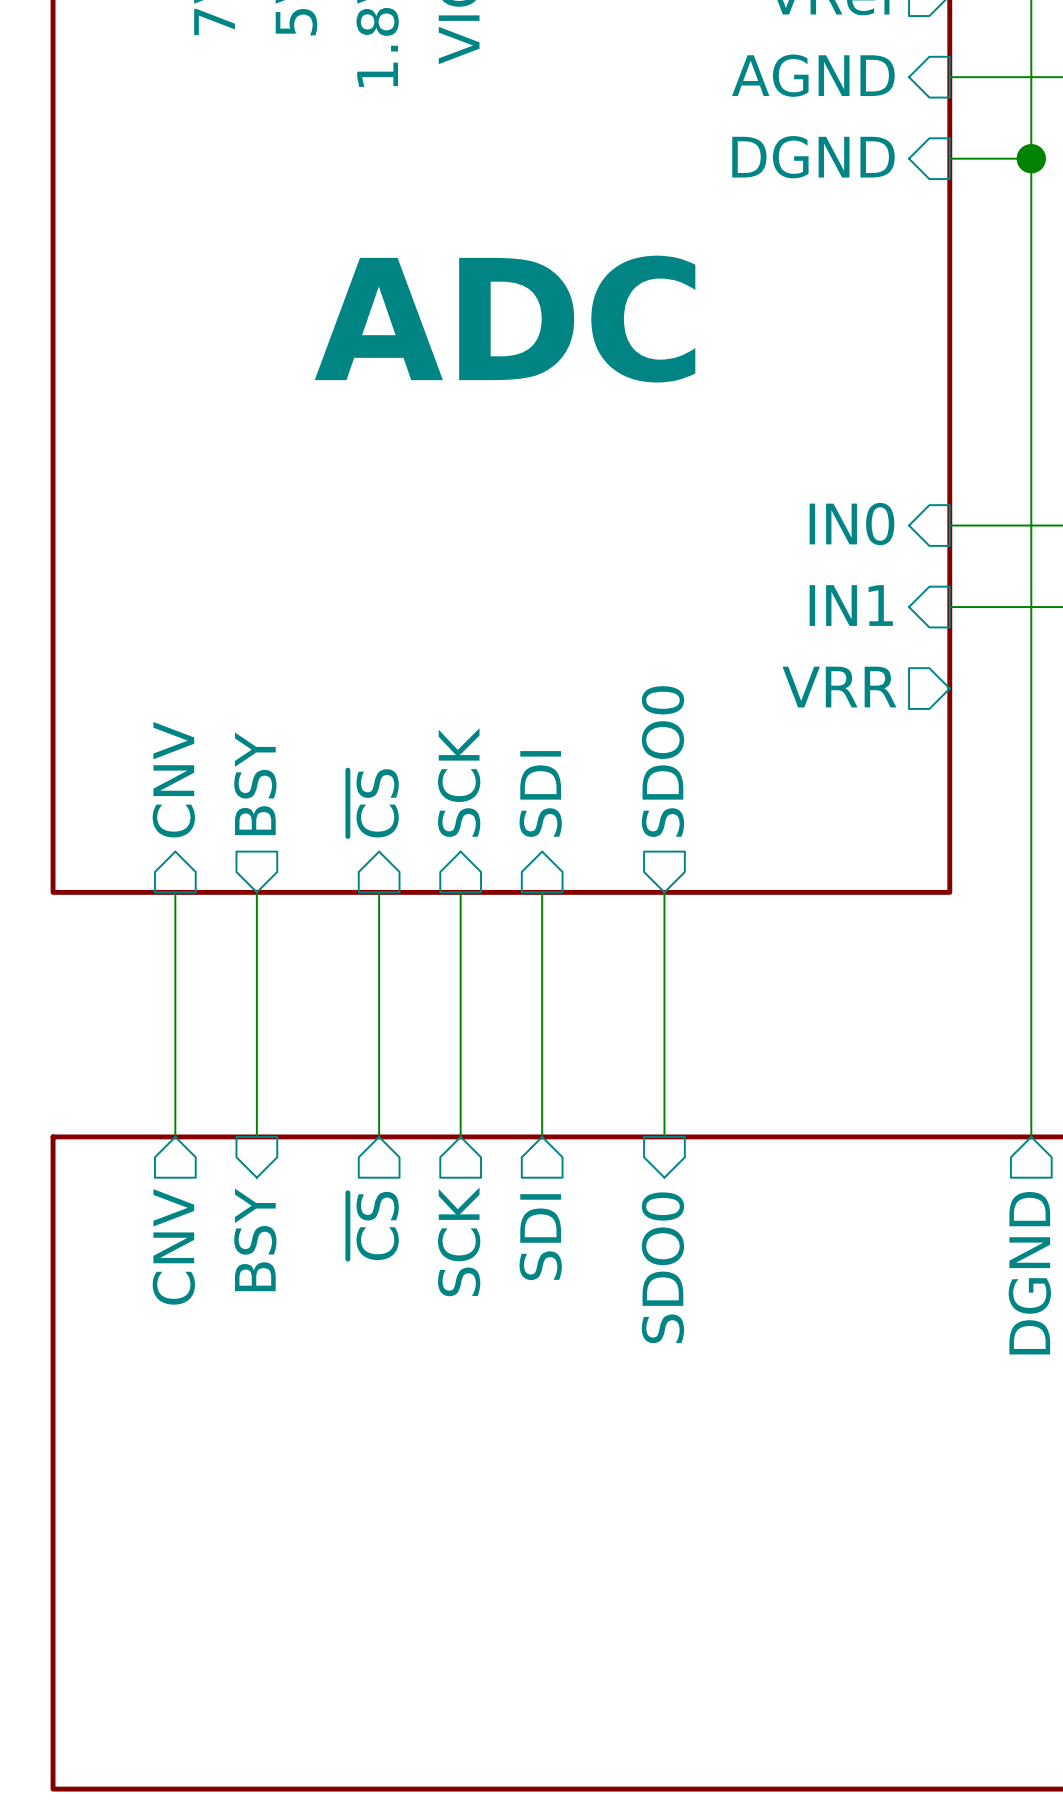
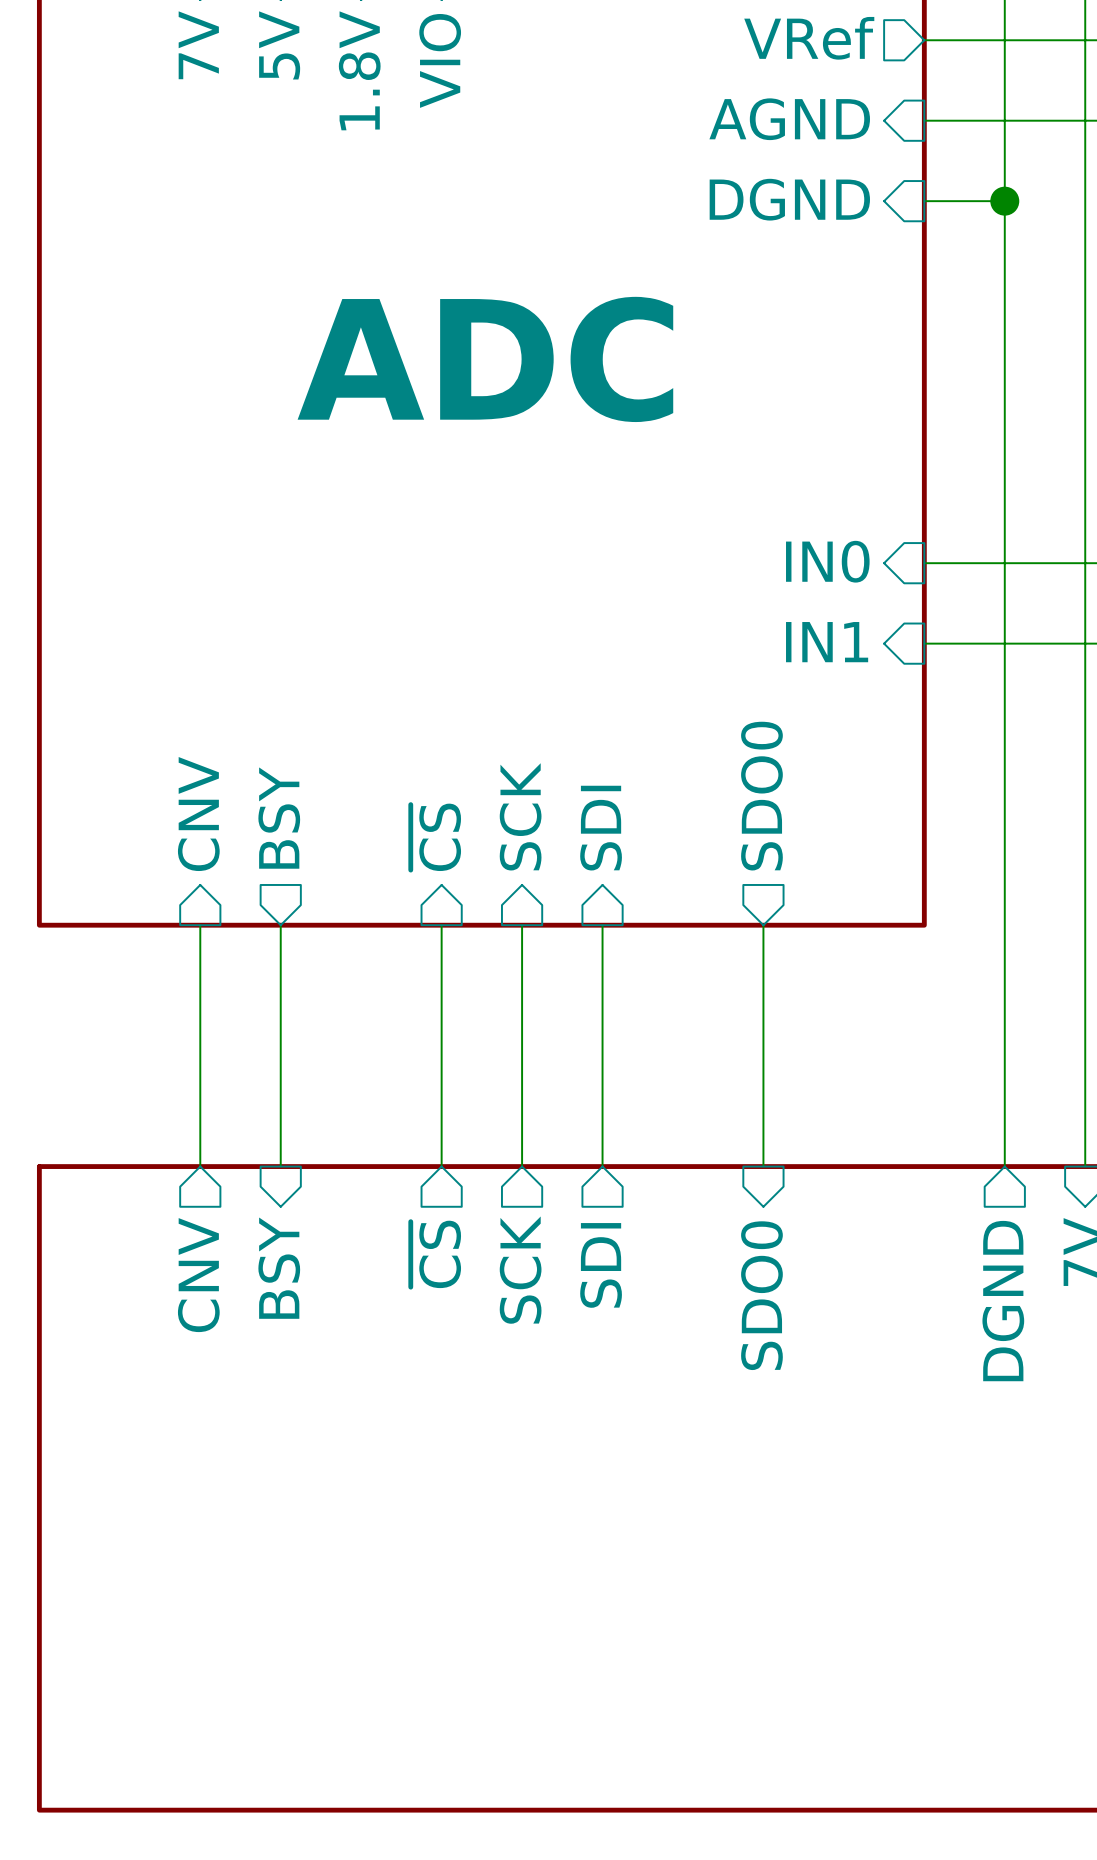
sheet pin: VRR (839, 687) -> none
sheet pin position: SDO0 (662, 761) -> SDO0 (761, 796)
sheet pin position: CNV (173, 779) -> CNV (198, 814)
sheet pin: SCK (459, 782) -> ~{CS} (435, 837)
sheet pin position: BSY (255, 783) -> BSY (279, 818)
sheet pin: SDI (540, 793) -> SCK (520, 816)
sheet pin: none -> SDI (601, 828)
sheet pin: ~{CS} (373, 803) -> none
wire: (175, 892) (175, 1136) -> (200, 925) (200, 1166)
wire: (256, 892) (256, 1136) -> (280, 925) (280, 1166)
wire: (379, 892) (379, 1136) -> (763, 925) (763, 1166)
wire: (664, 892) (664, 1136) -> (602, 925) (602, 1166)
sheet pin: ~{CS} (373, 1225) -> none
sheet pin: SDI (540, 1237) -> SCK (520, 1270)
sheet pin: none -> SDI (601, 1265)
sheet pin position: BSY (255, 1239) -> BSY (279, 1268)
sheet pin: SCK (459, 1241) -> ~{CS} (435, 1254)
sheet pin position: CNV (173, 1246) -> CNV (198, 1275)
sheet pin position: SDO0 (662, 1267) -> SDO0 (761, 1295)

